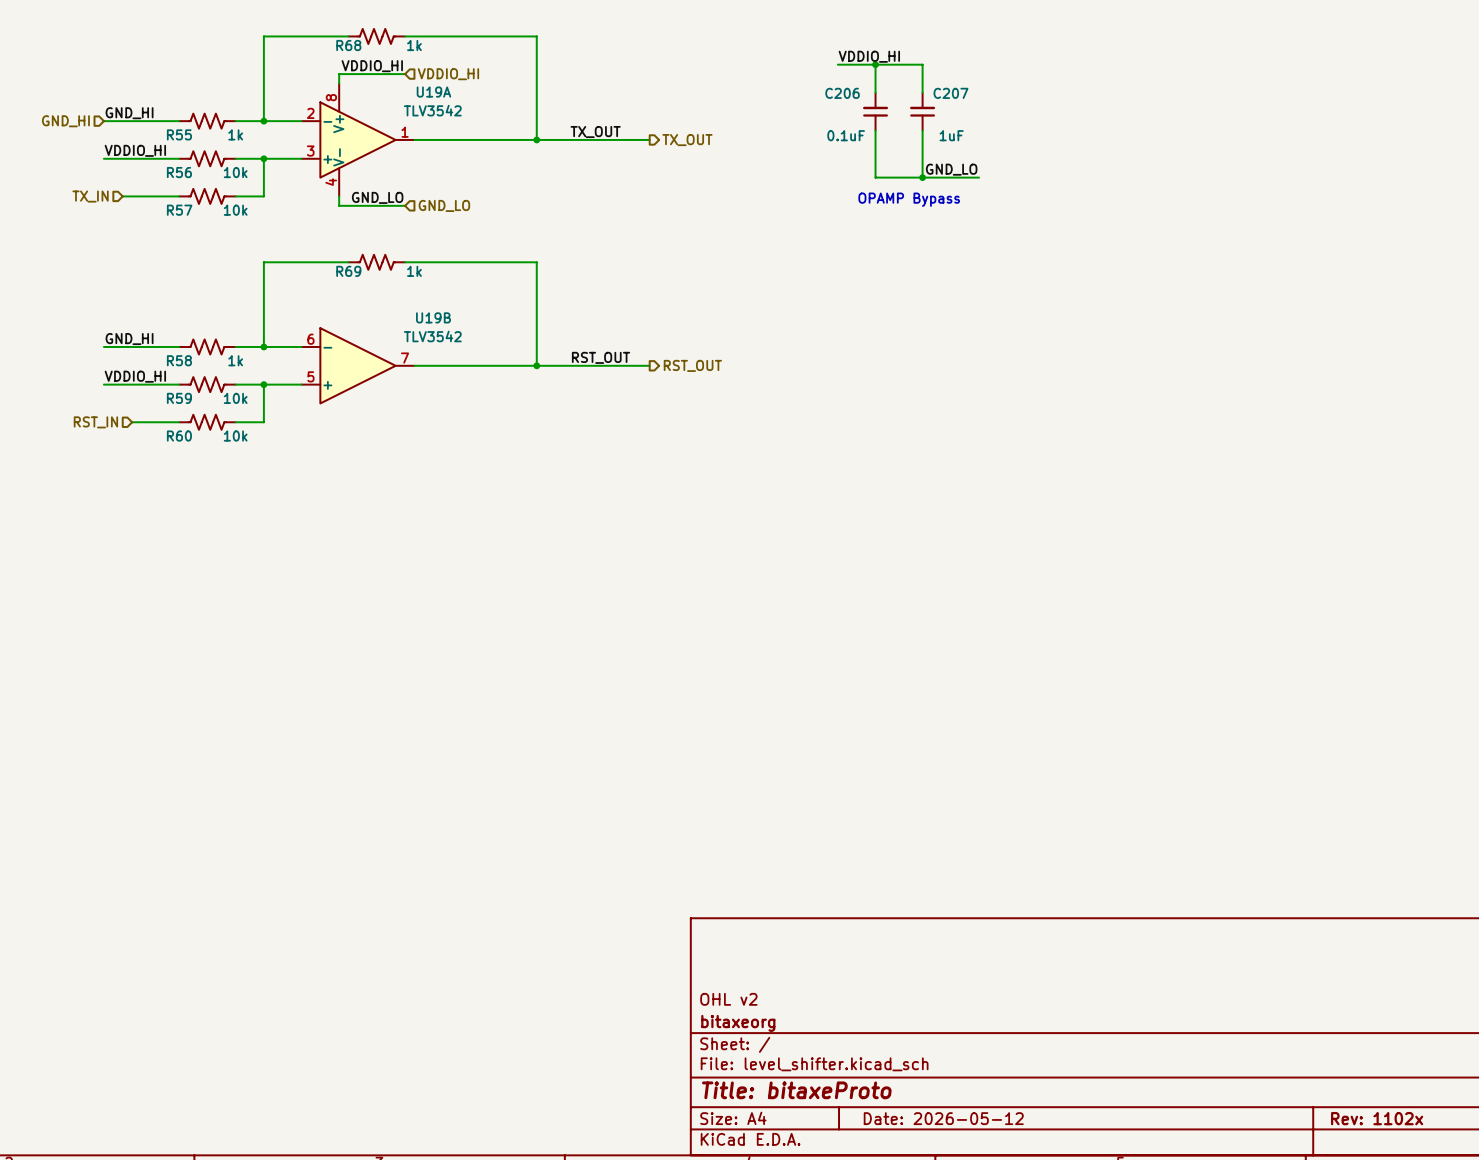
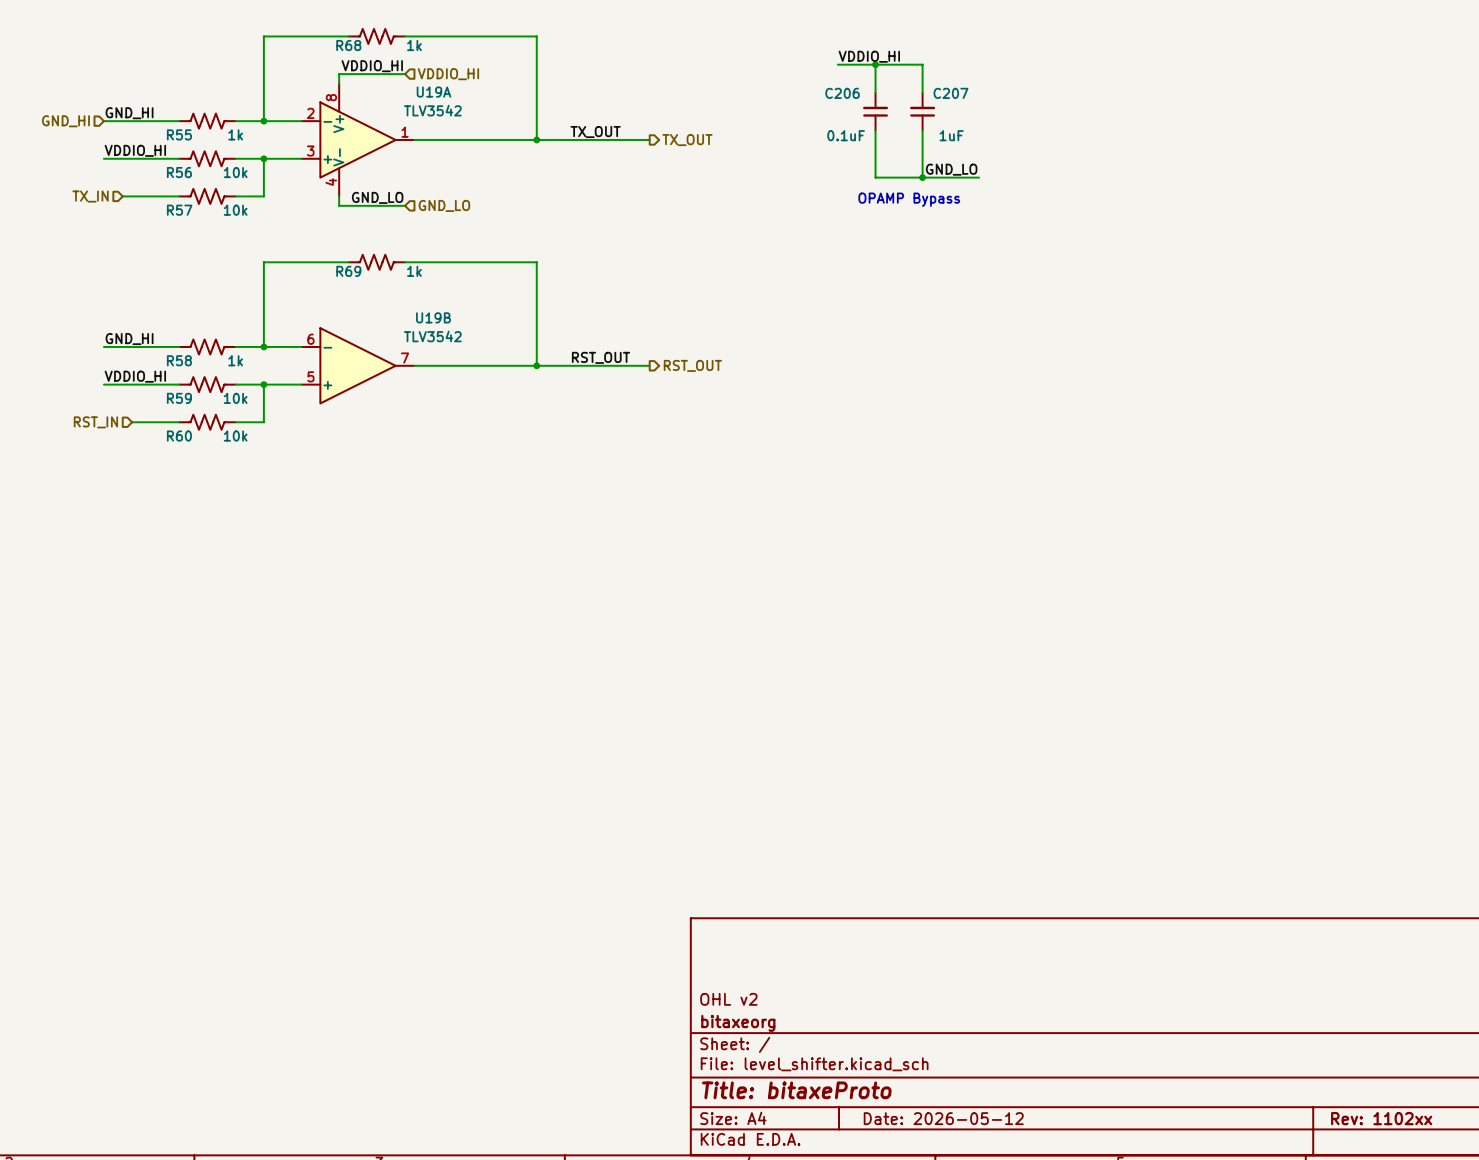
title block: Rev: 1102x (1377, 1118) -> Rev: 1102xx (1381, 1118)

